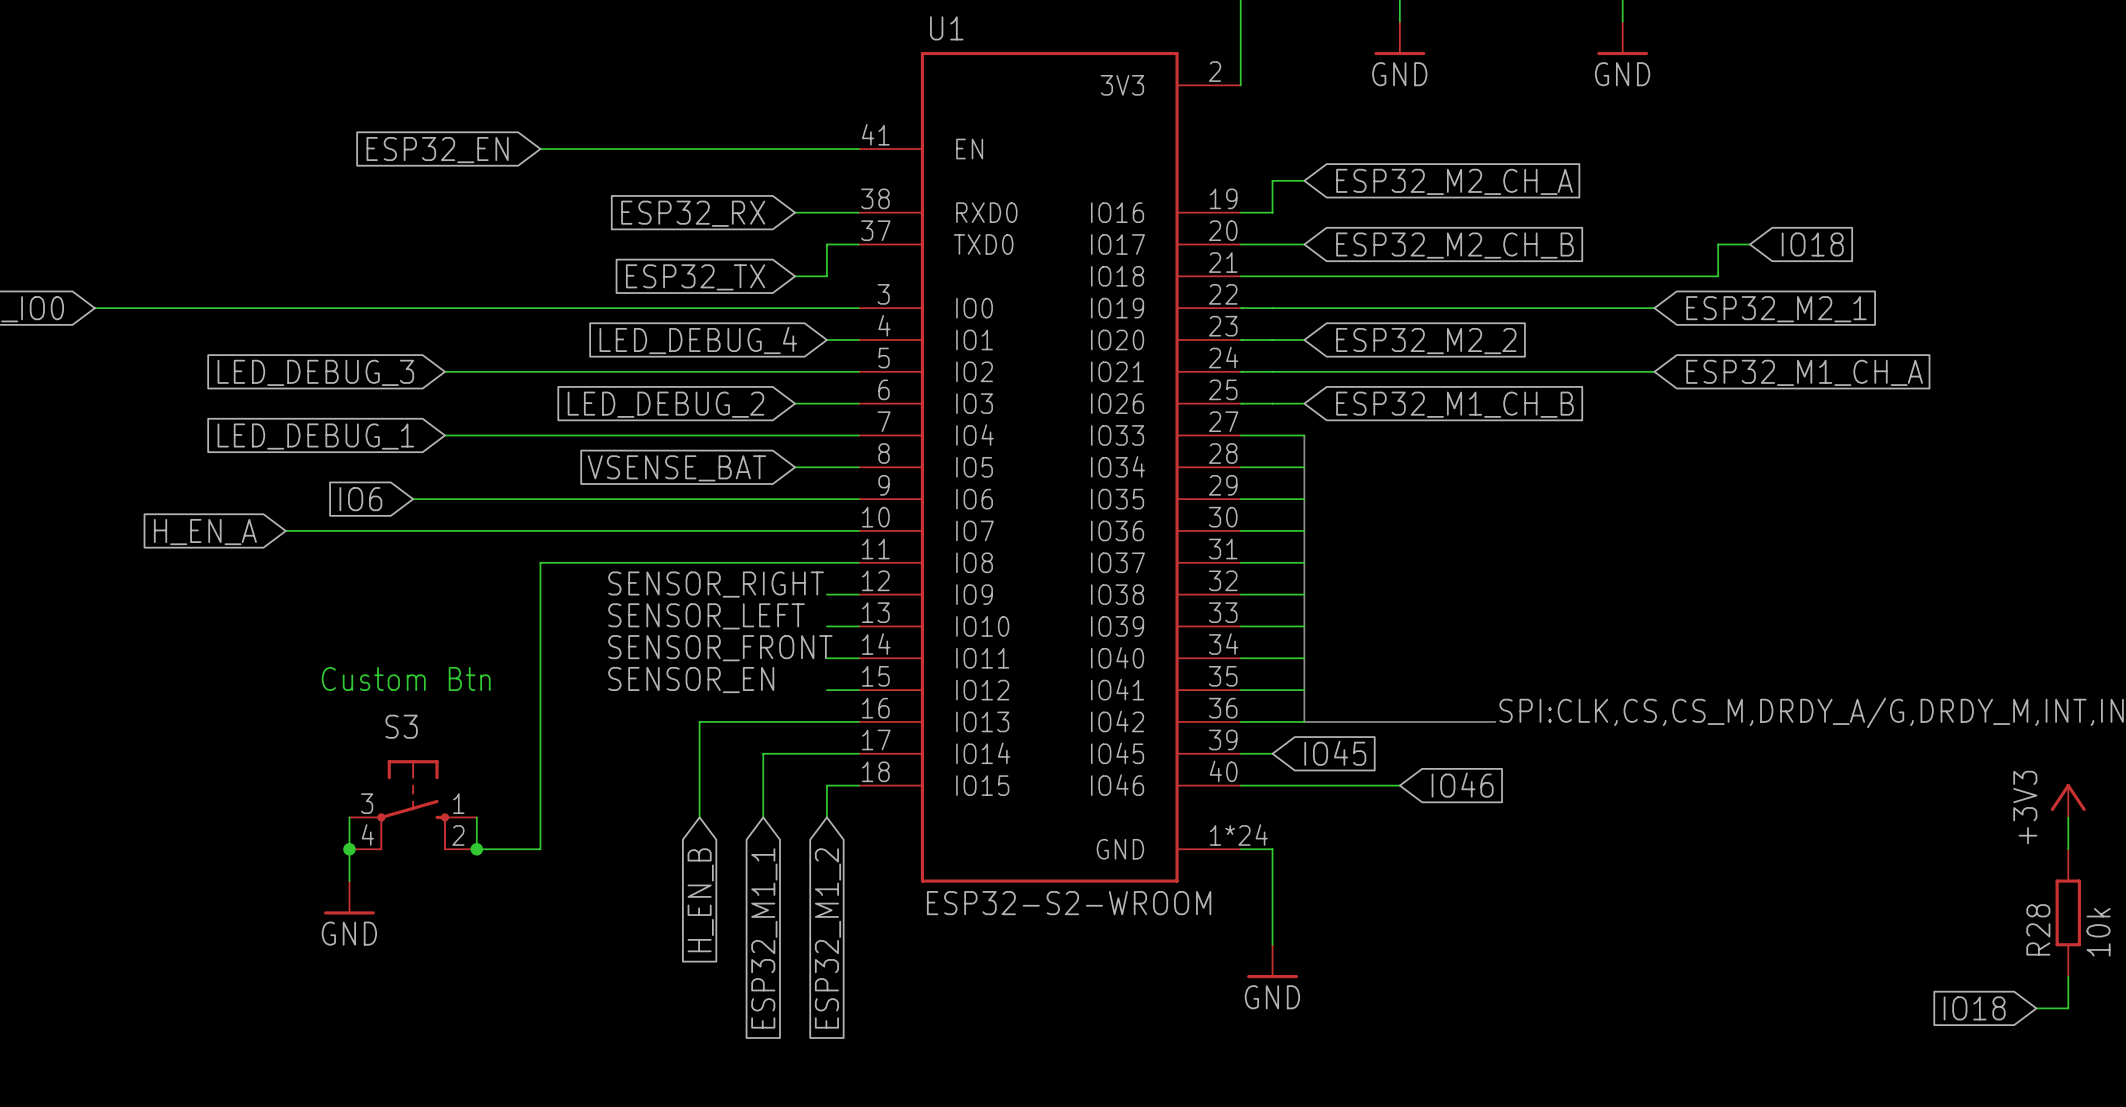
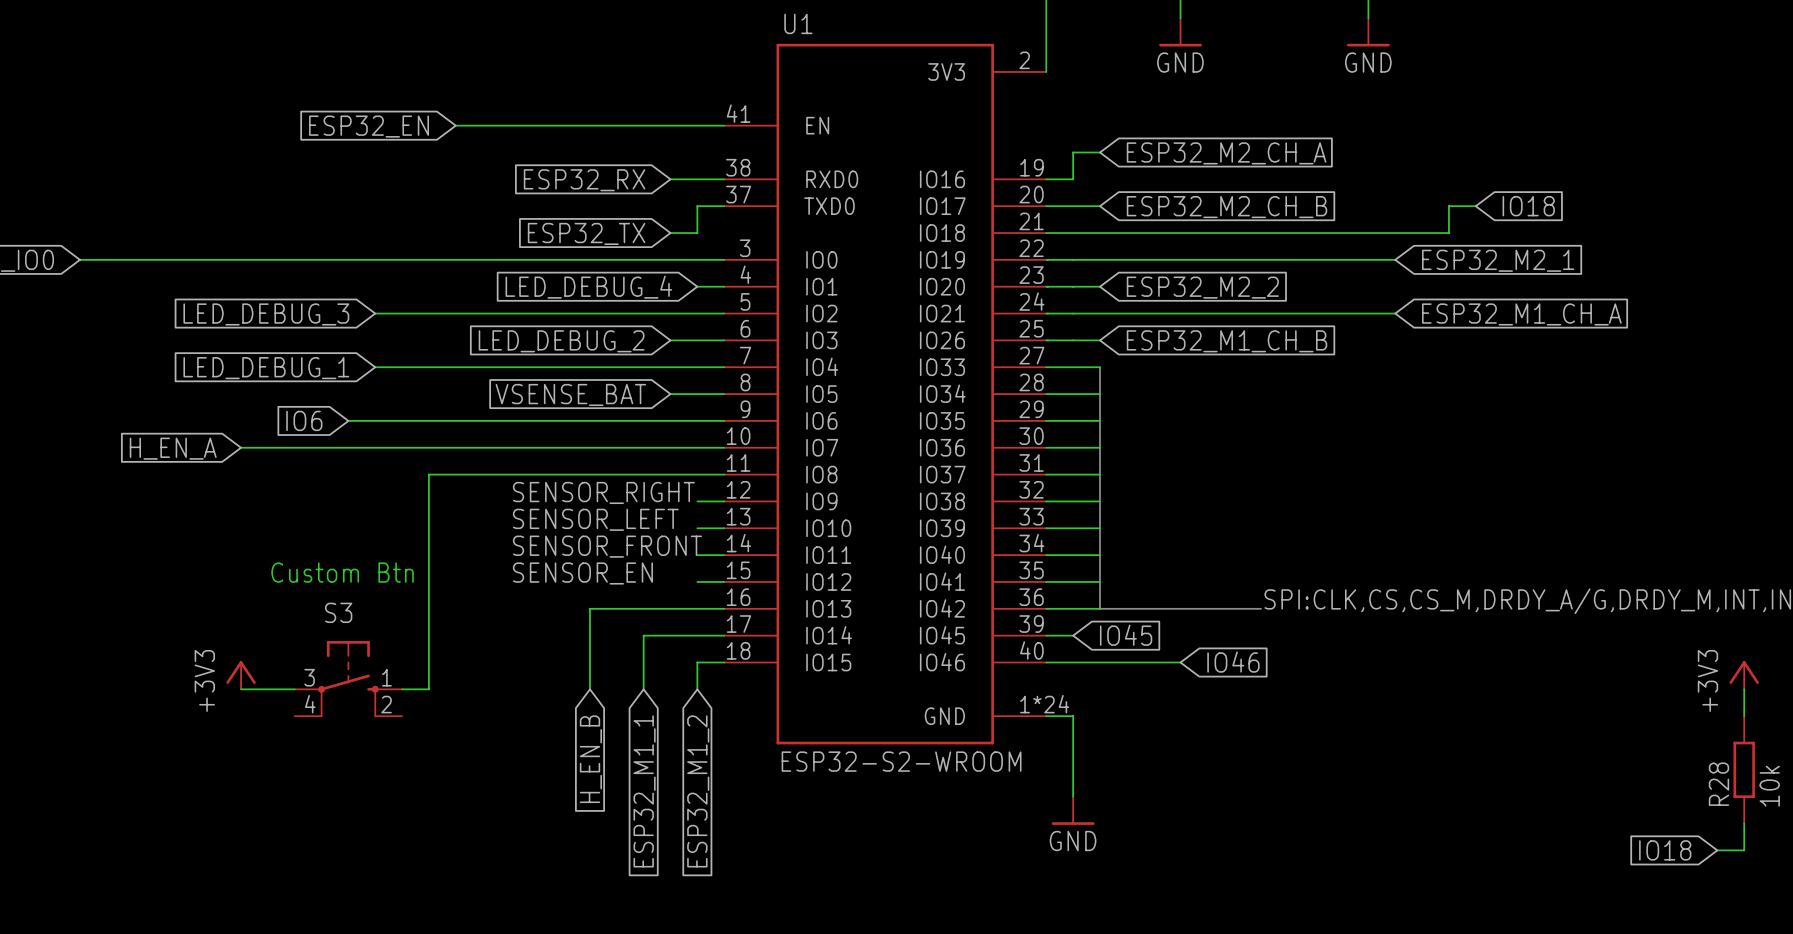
wire: (540, 562) (540, 849) (476, 849) (476, 817) -> (455, 474) (428, 474) (428, 689) (402, 689)
power symbol: none -> +3V3 (241, 675)
wire: (349, 817) (349, 881) -> (294, 689) (241, 689)
junction: (349, 849) -> none
junction: (476, 849) -> none
power symbol: GND (349, 897) -> none

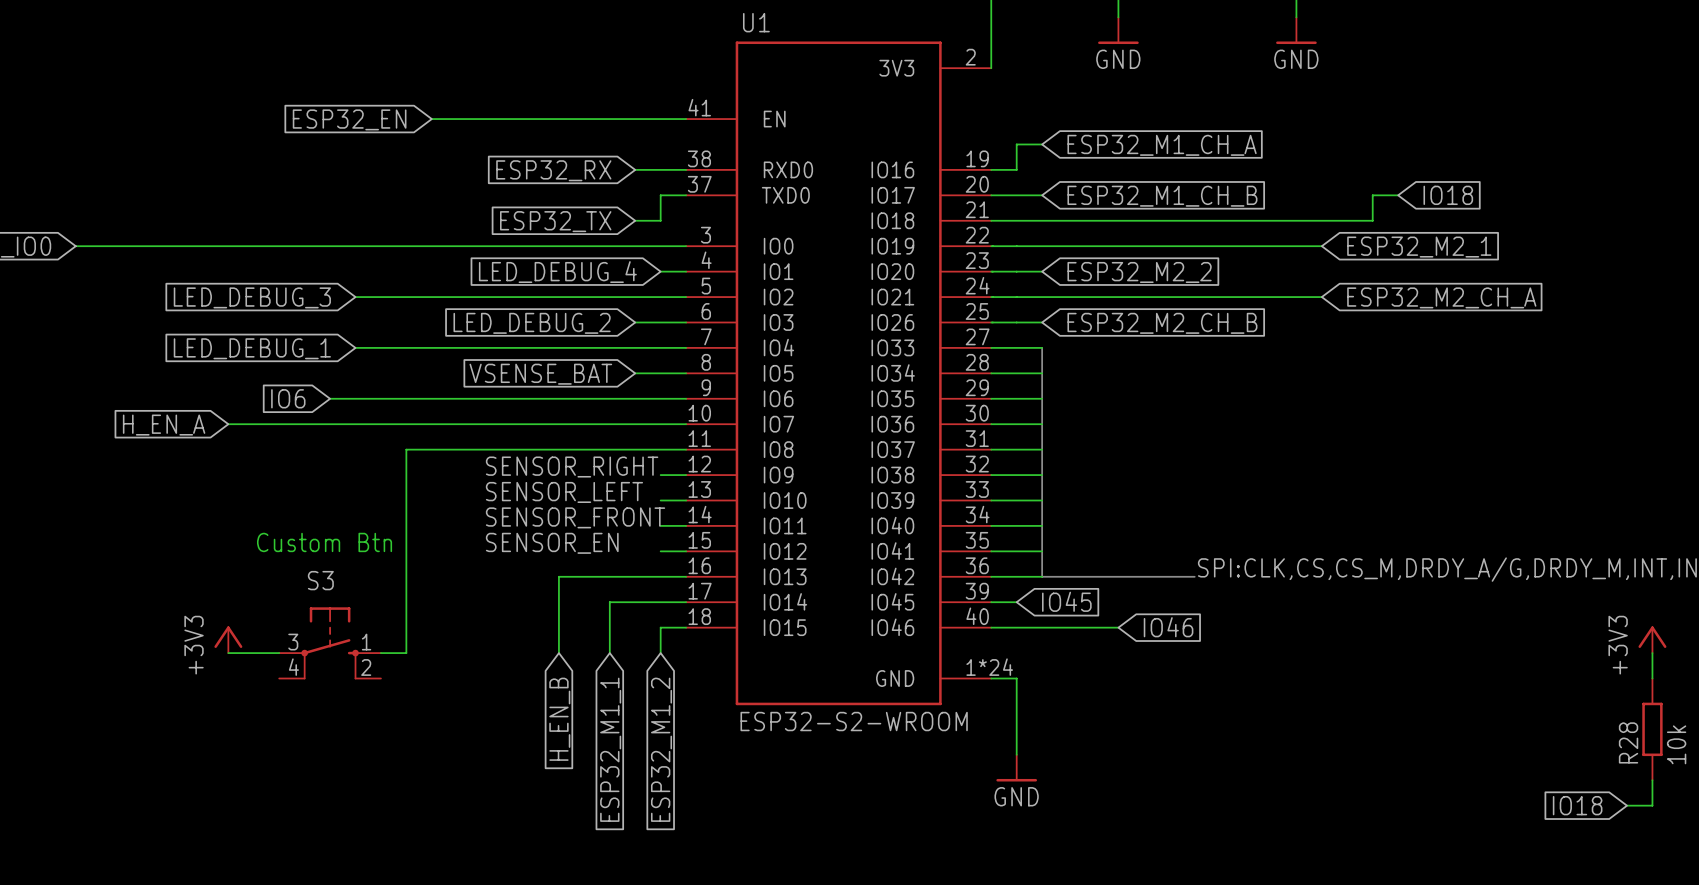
global label: ESP32_M2_CH_A (1226, 153) -> ESP32_M1_CH_A (1162, 145)
global label: ESP32_M2_CH_B (1227, 207) -> ESP32_M1_CH_B (1162, 196)
global label: ESP32_M1_CH_A (1521, 314) -> ESP32_M2_CH_A (1441, 297)
global label: ESP32_M1_CH_B (1227, 341) -> ESP32_M2_CH_B (1162, 323)

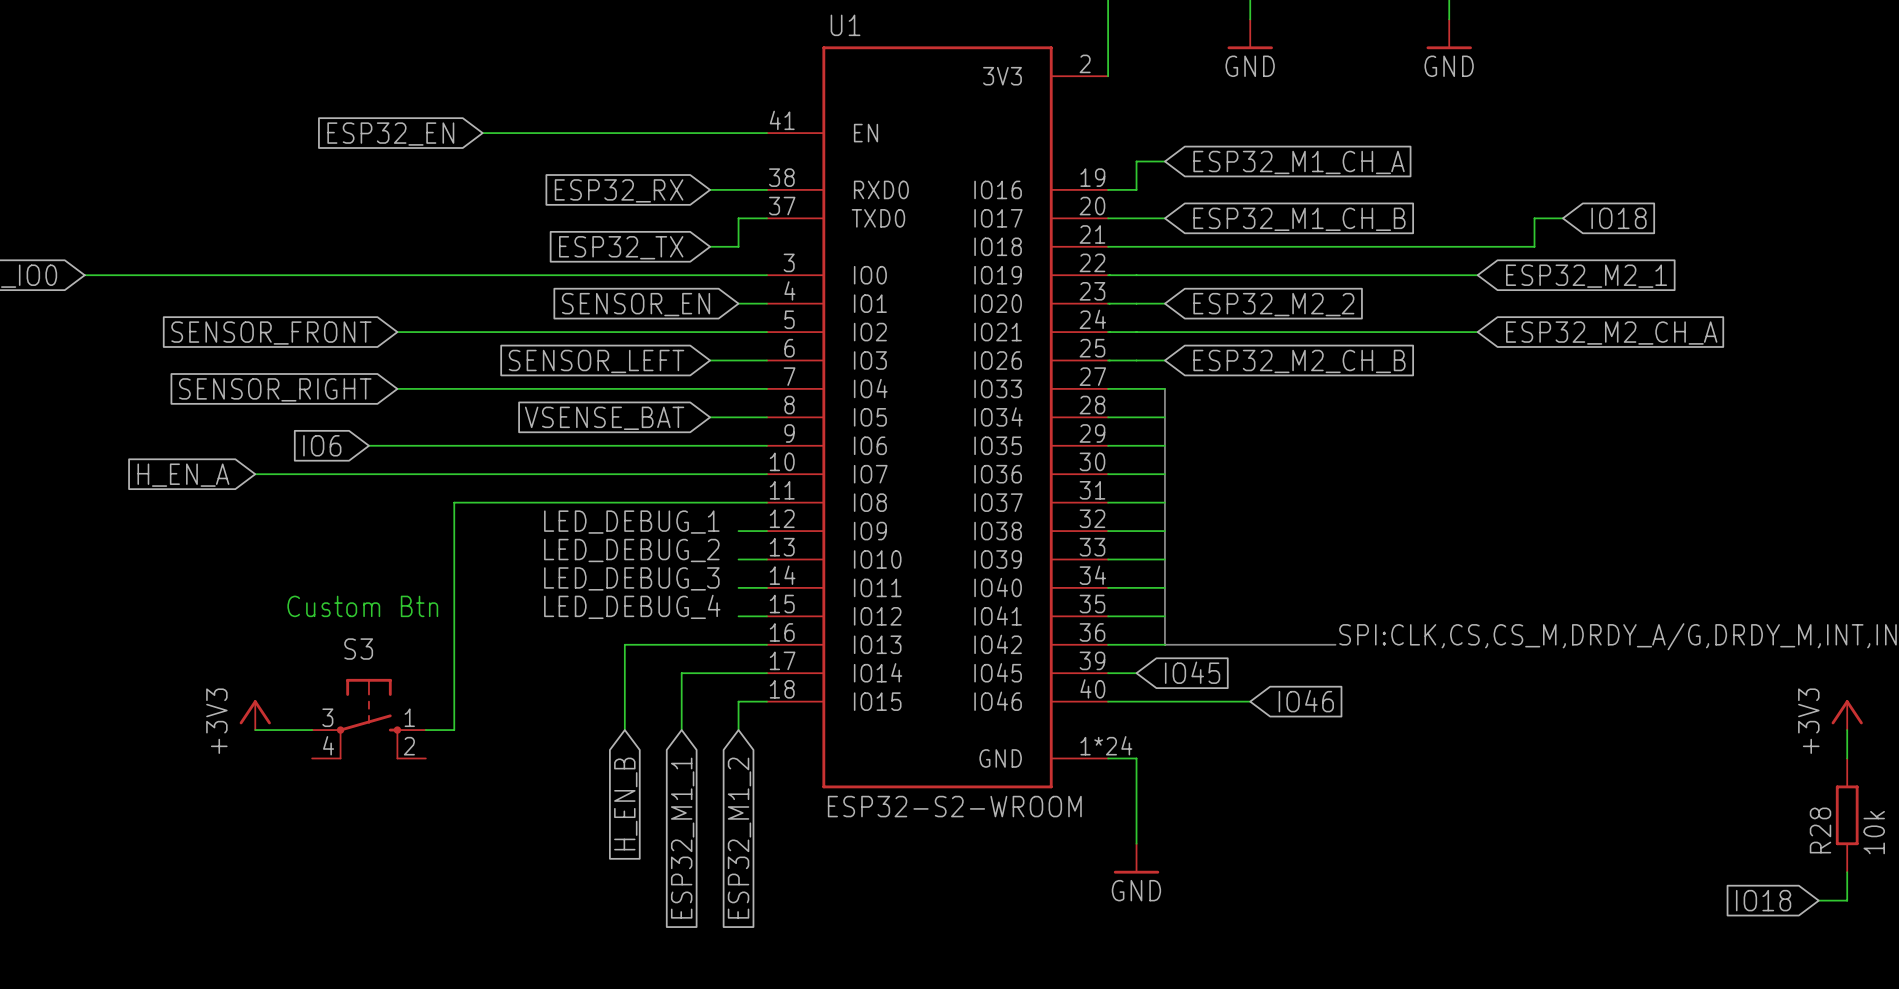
global label: LED_DEBUG_4 (557, 272) -> SENSOR_EN (636, 304)
global label: LED_DEBUG_3 (252, 297) -> SENSOR_FRONT (271, 333)
global label: LED_DEBUG_2 (532, 323) -> SENSOR_LEFT (596, 361)
global label: LED_DEBUG_1 (252, 348) -> SENSOR_RIGHT (275, 389)
label: SENSOR_RIGHT (572, 467) -> LED_DEBUG_1 (631, 522)
label: SENSOR_LEFT (564, 492) -> LED_DEBUG_2 (631, 550)
label: SENSOR_FRONT (575, 517) -> LED_DEBUG_3 (631, 578)
label: SENSOR_EN (552, 543) -> LED_DEBUG_4 (632, 606)

